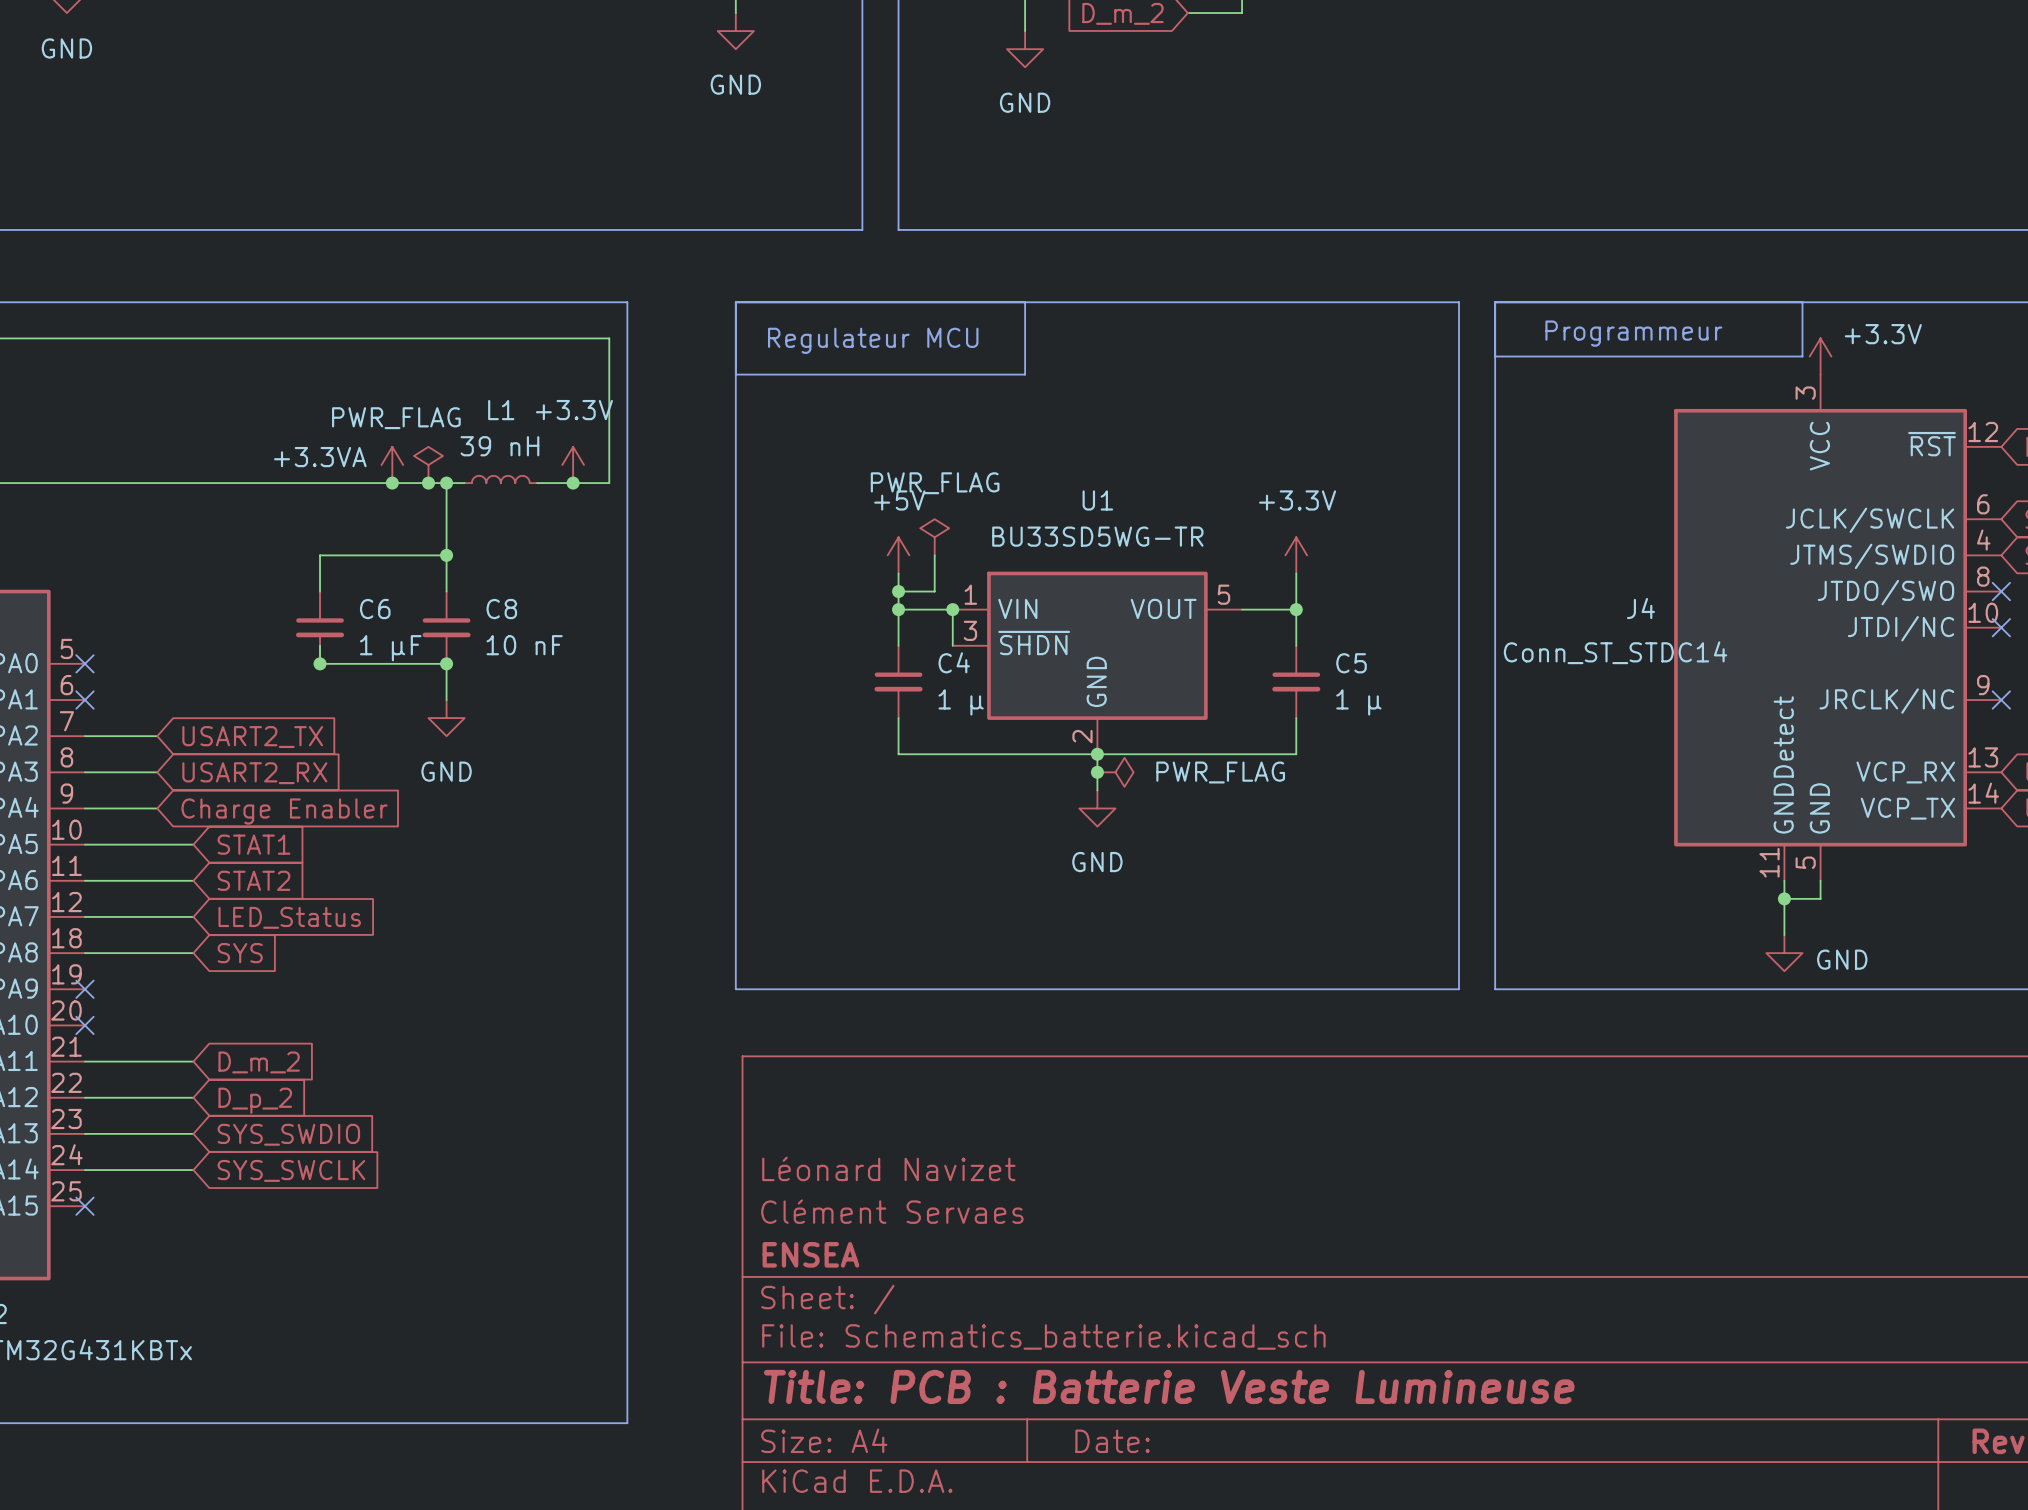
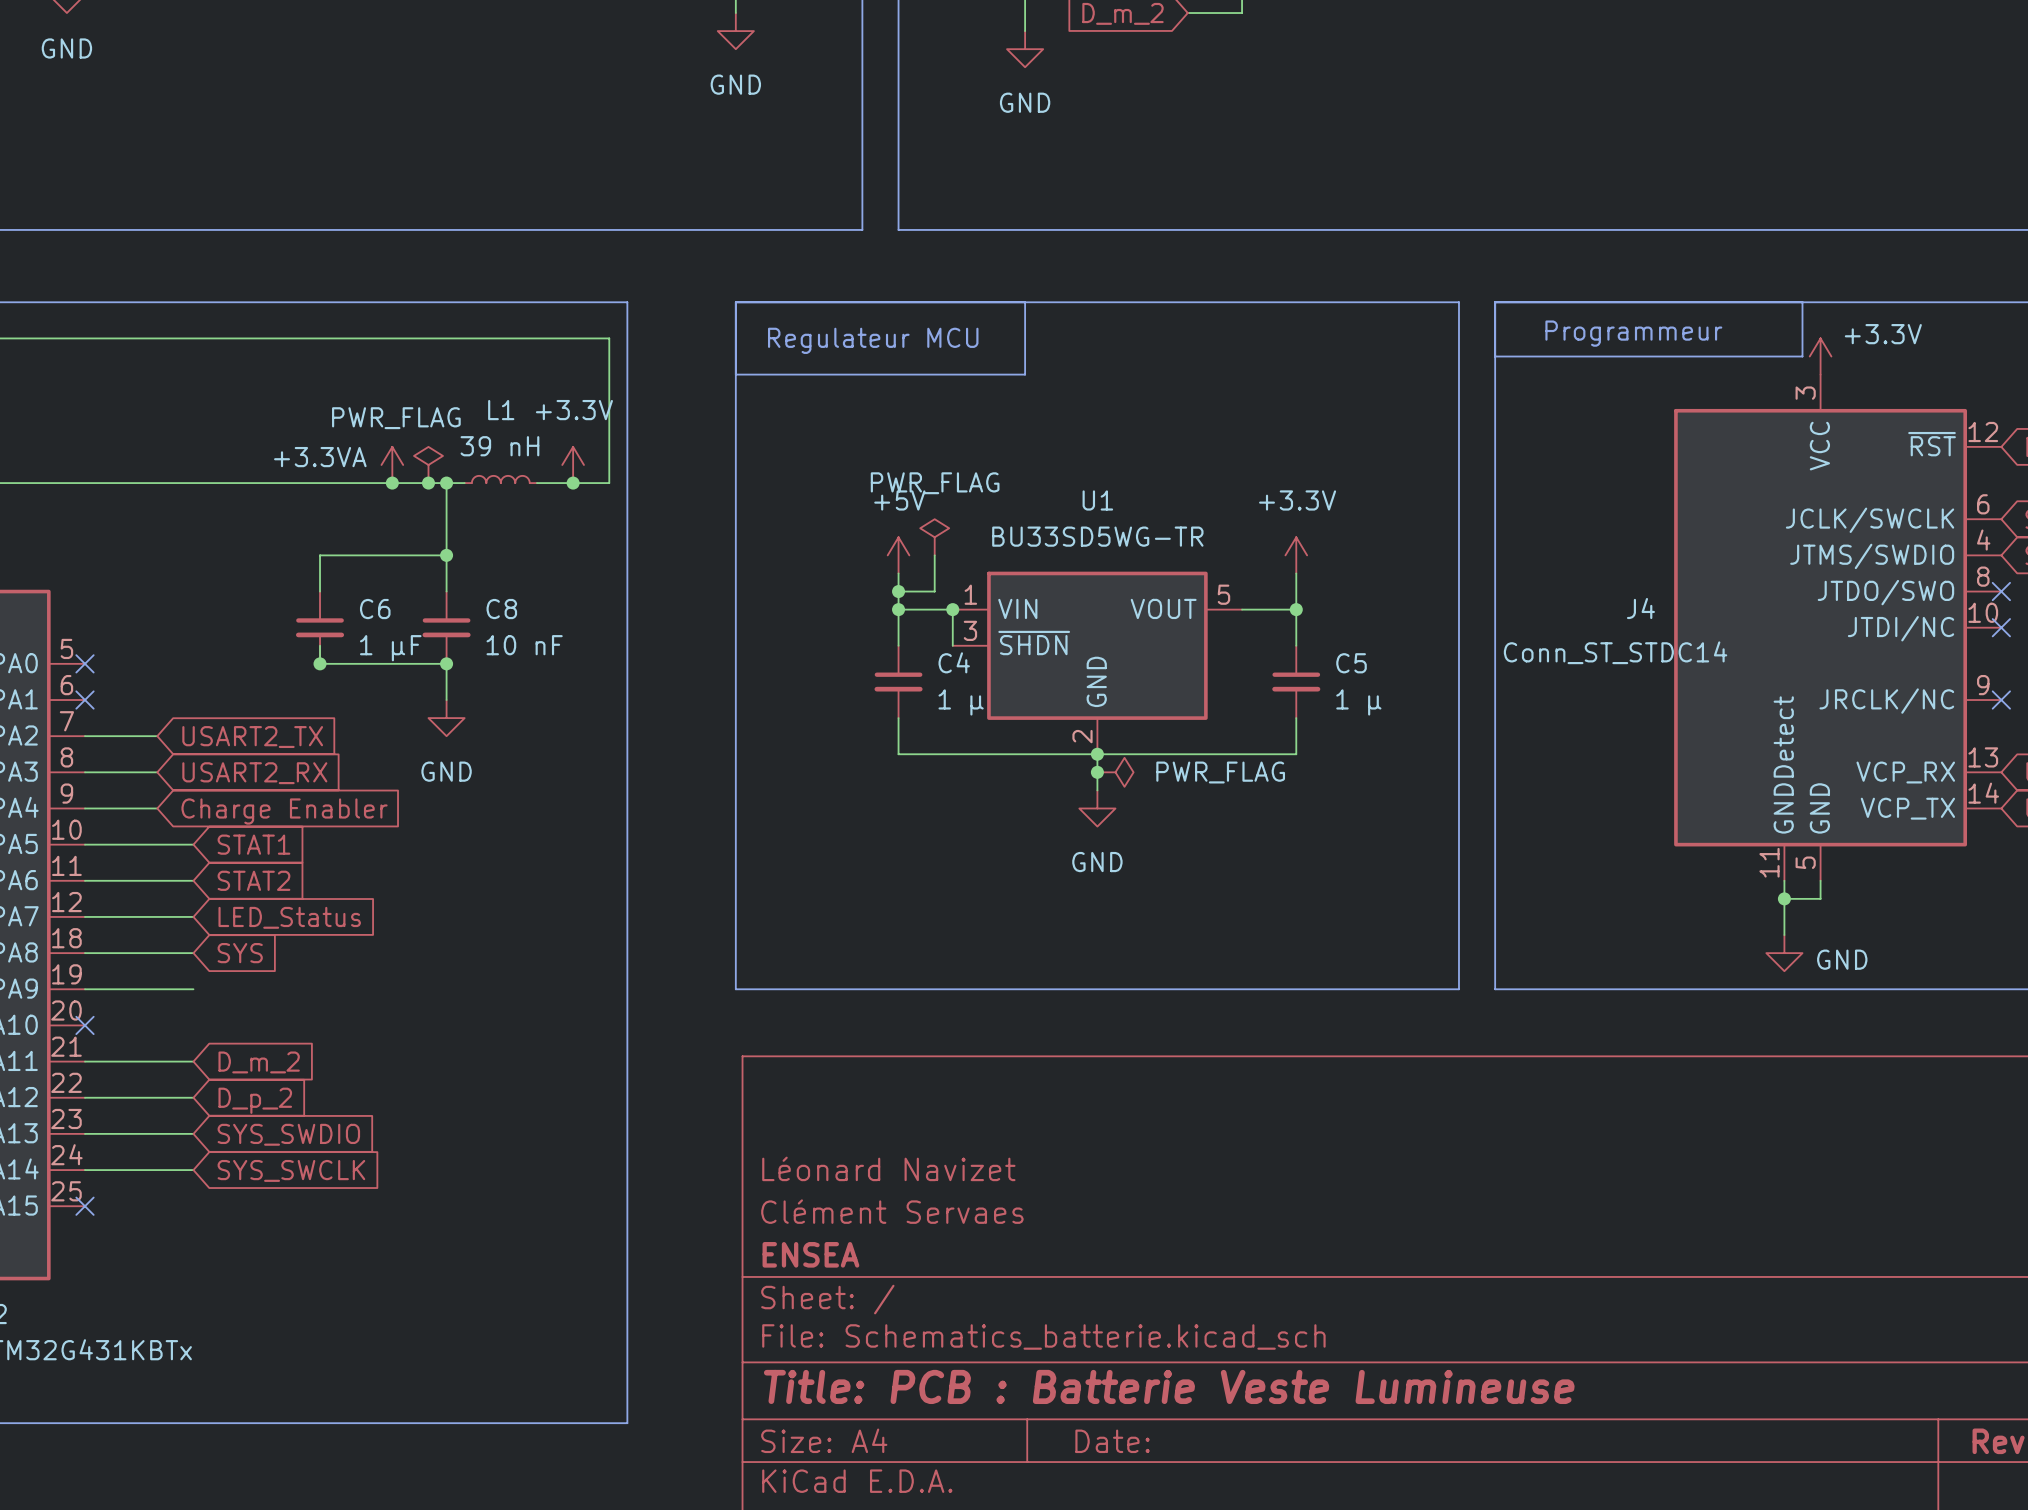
wire: none -> (84, 989) (193, 989)
no-connect mark: (84, 989) -> none

